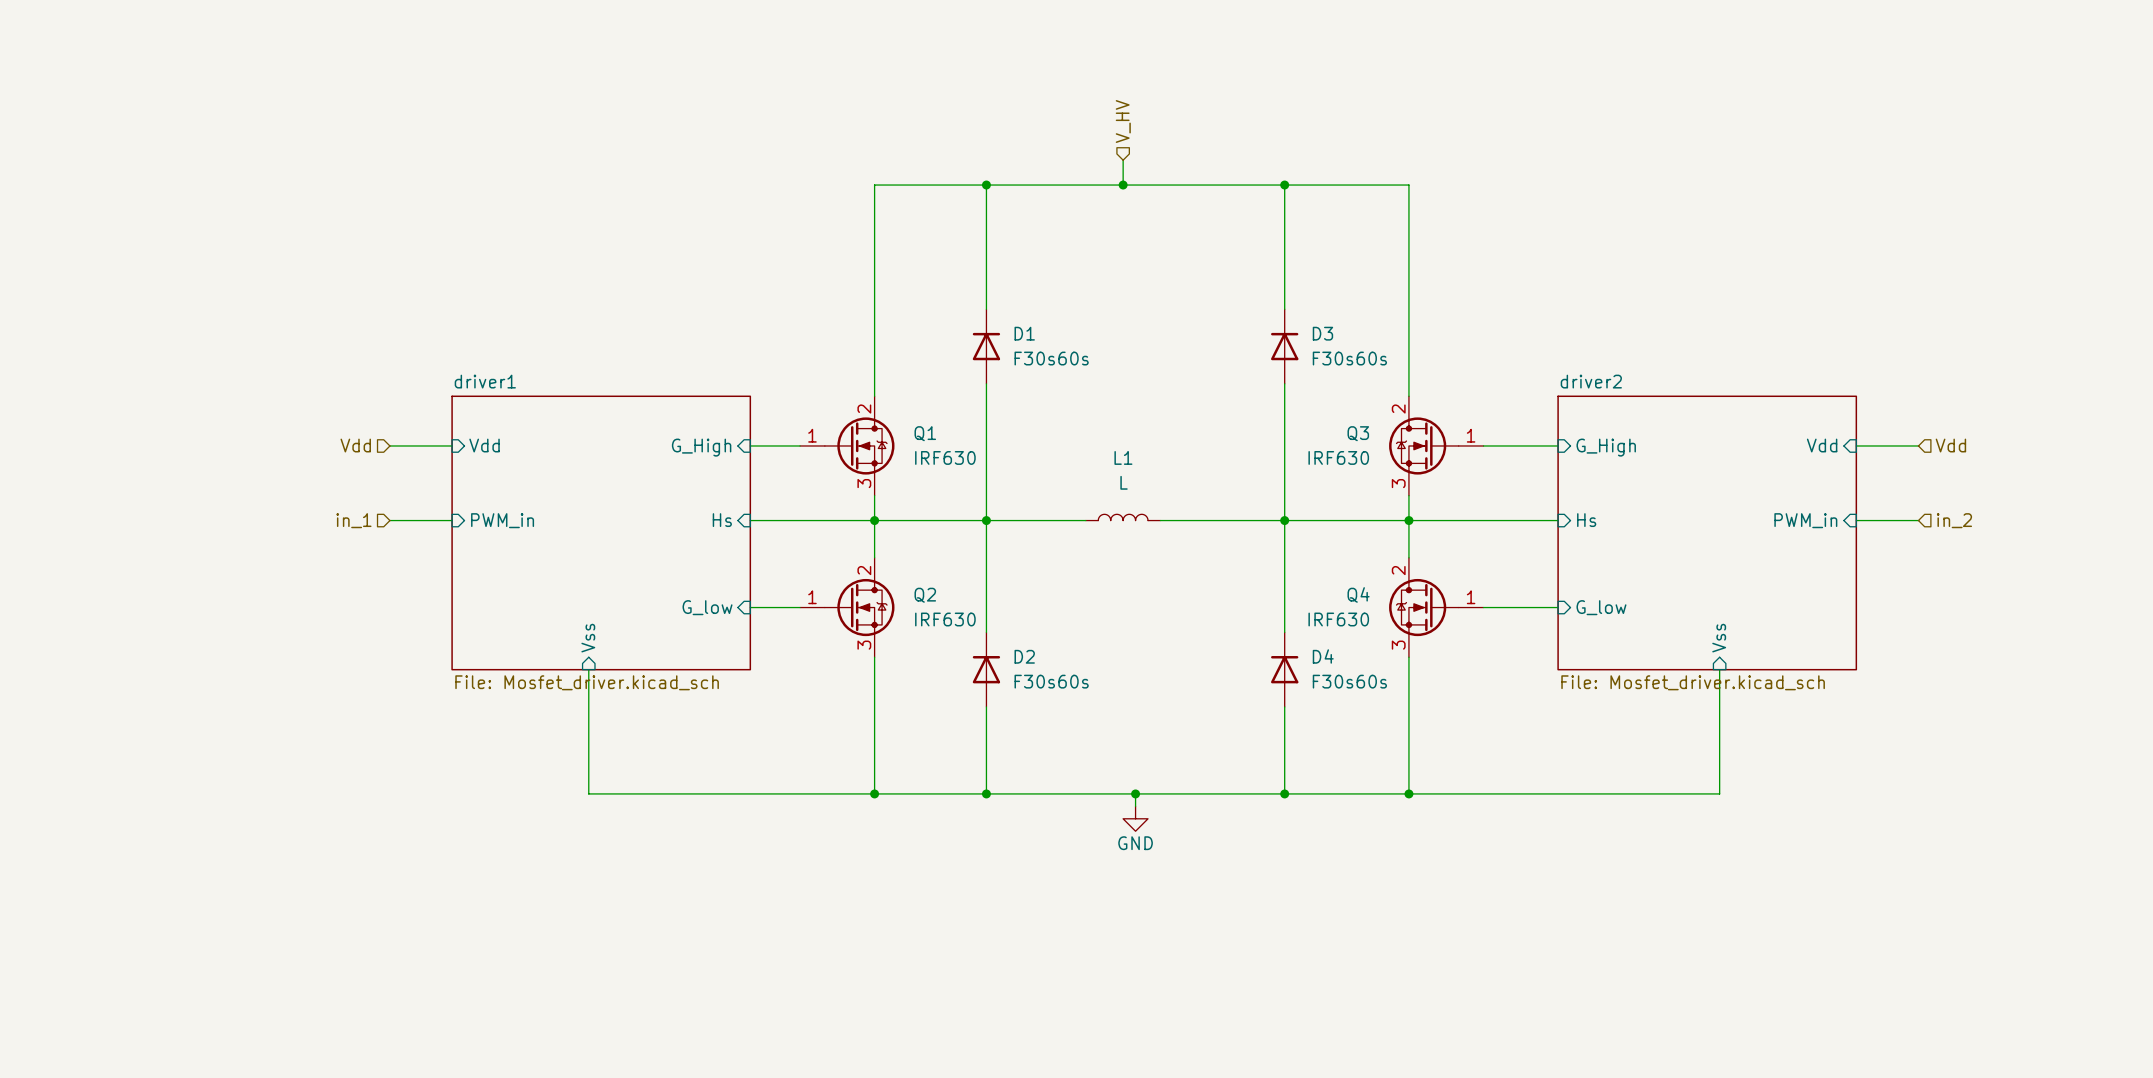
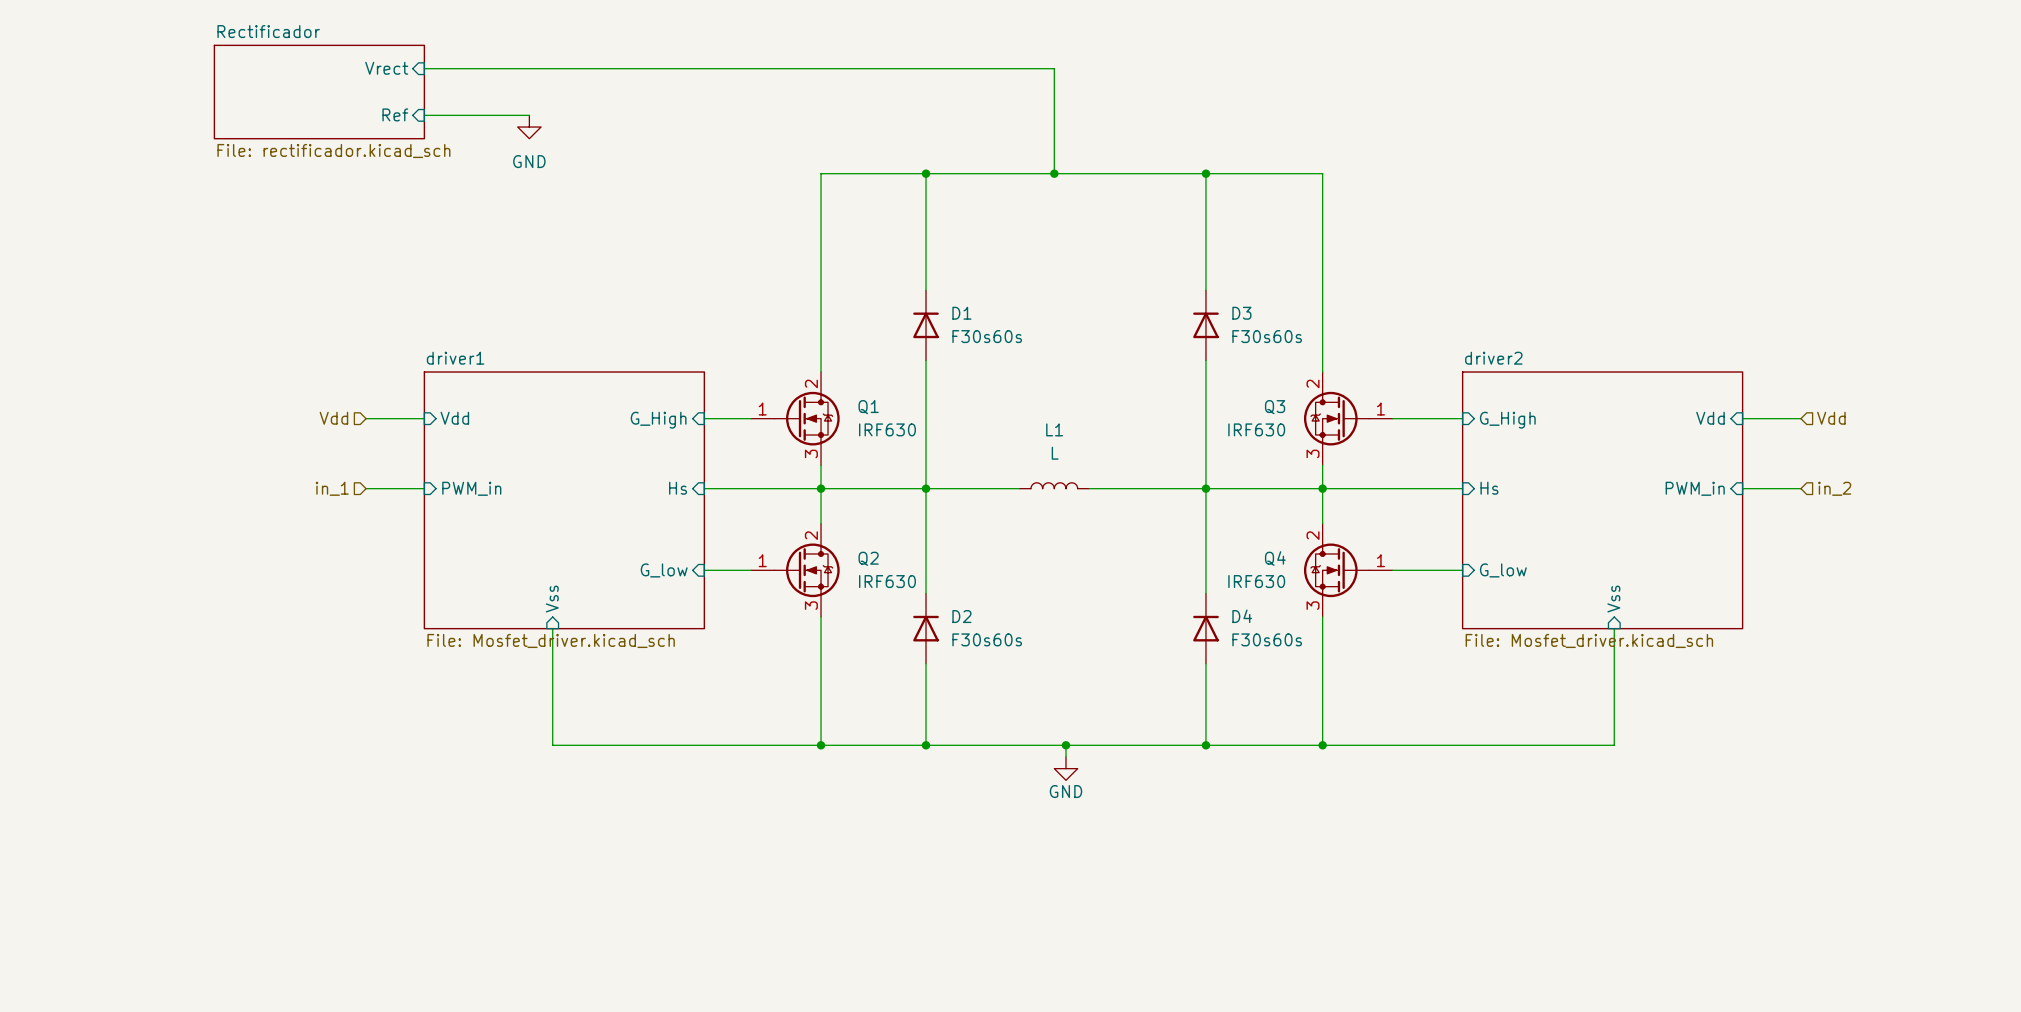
sheet pin: none -> Vrect (386, 68)
wire: none -> (424, 68) (1054, 68) (1054, 150)
sheet Rectificador: none -> File: rectificador.kicad_sch (319, 92)
hierarchical label: V_HV (1123, 121) -> none
sheet pin: none -> Ref (395, 114)
wire: none -> (424, 115) (529, 115)
power symbol: none -> GND (529, 127)

